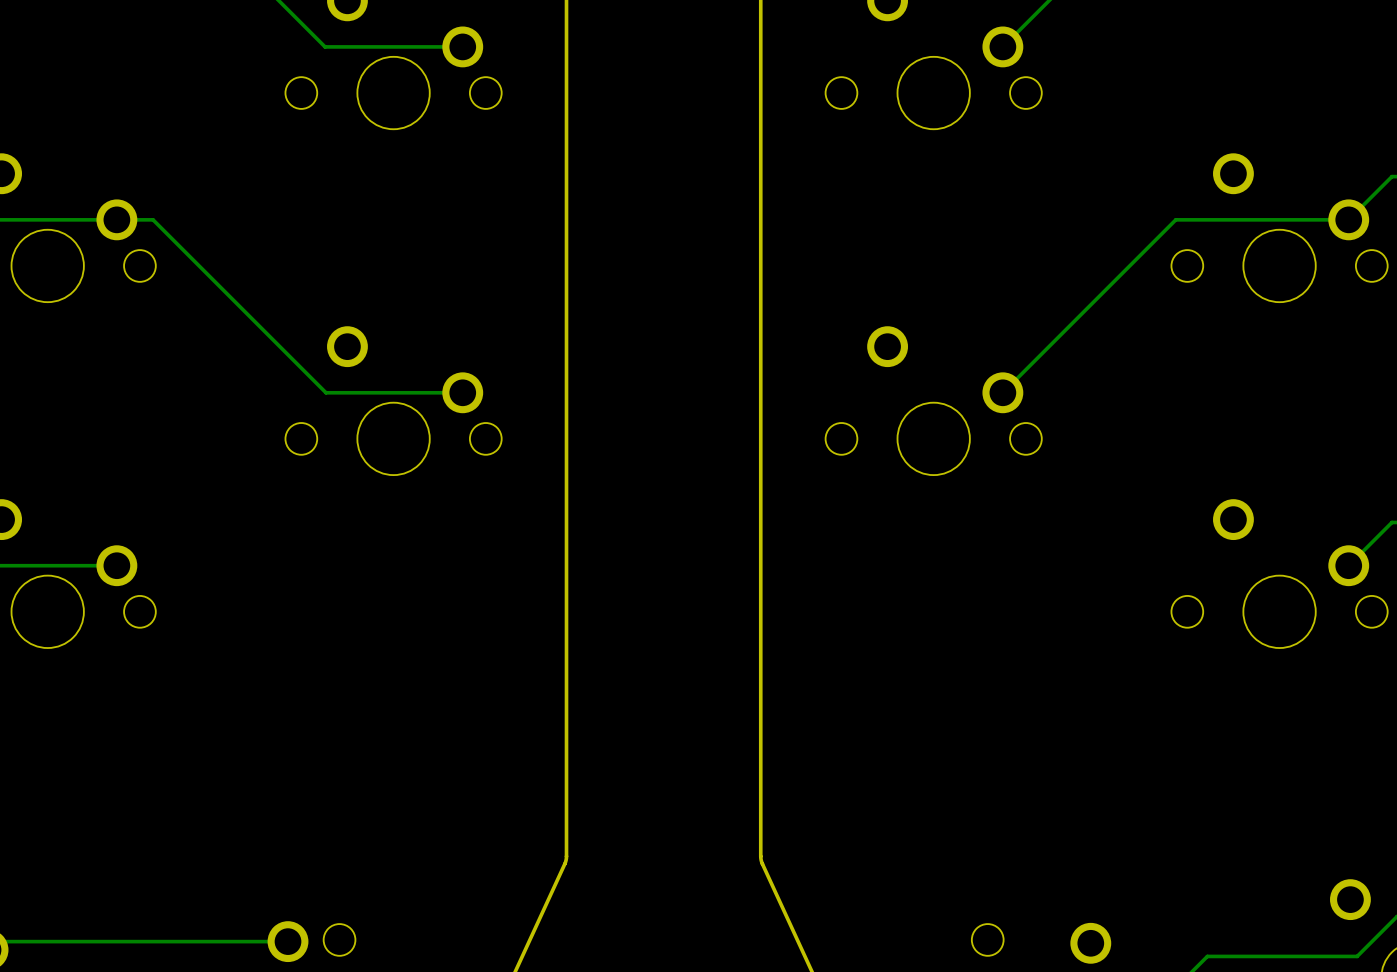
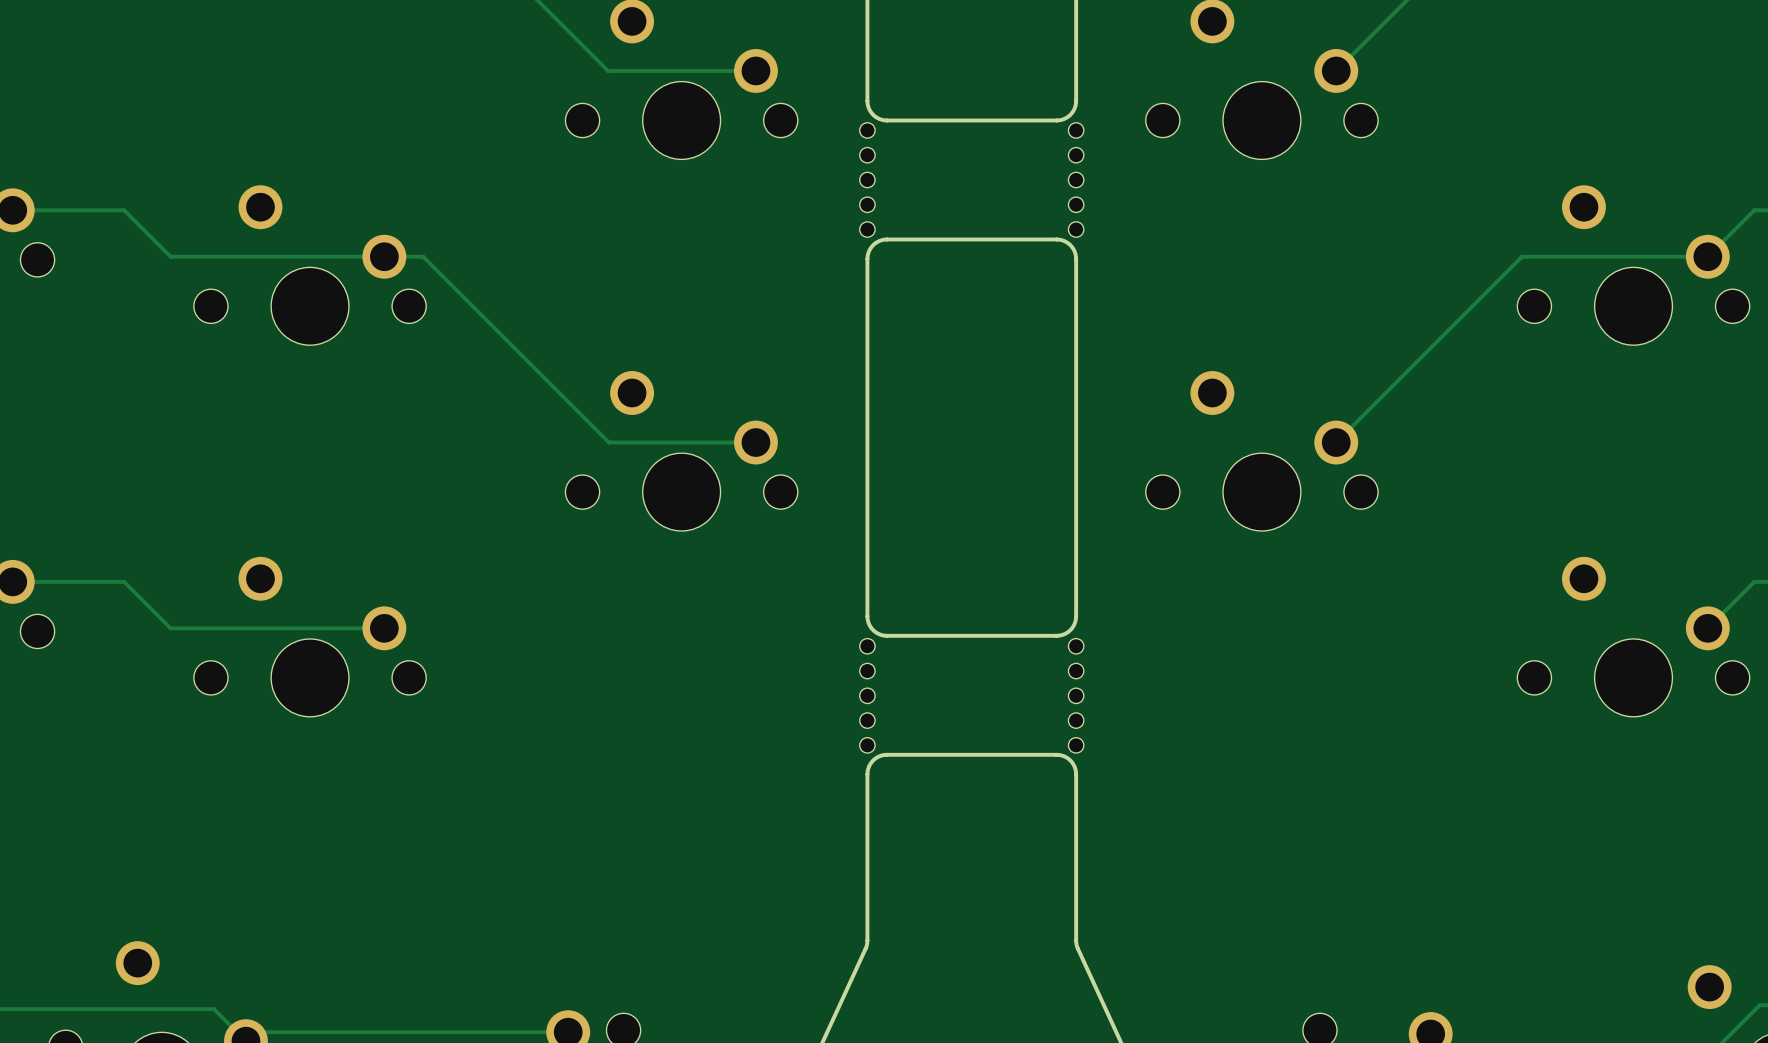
board edge: (566, 74) (566, 221) -> (867, 100) (873, 114) (886, 120) (1059, 120) (1072, 112) (1076, 100)
board edge: (760, 74) (760, 221) -> (867, 258) (873, 245) (886, 239) (1059, 239) (1072, 247) (1076, 258)
part: none -> (867, 179)
part: none -> (1076, 179)
board edge: (566, 554) (566, 701) -> (867, 616) (873, 630) (886, 635) (1059, 635) (1072, 628) (1076, 616)
board edge: (760, 554) (760, 701) -> (867, 774) (873, 760) (886, 754) (1059, 754) (1072, 762) (1076, 774)
part: none -> (867, 695)
part: none -> (1076, 695)

